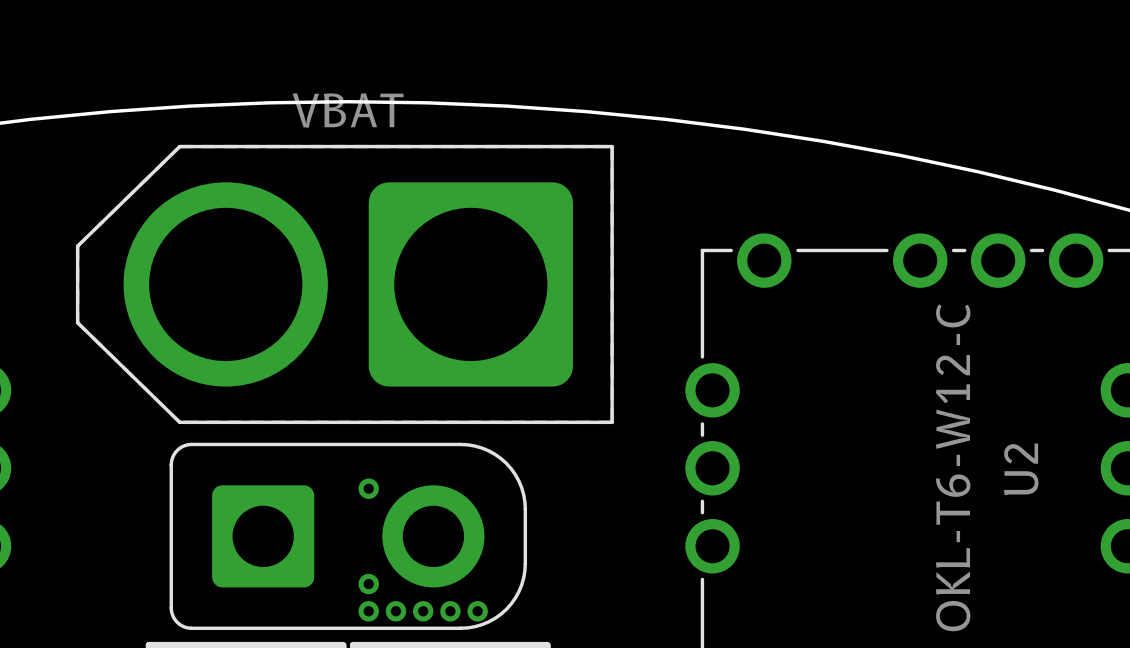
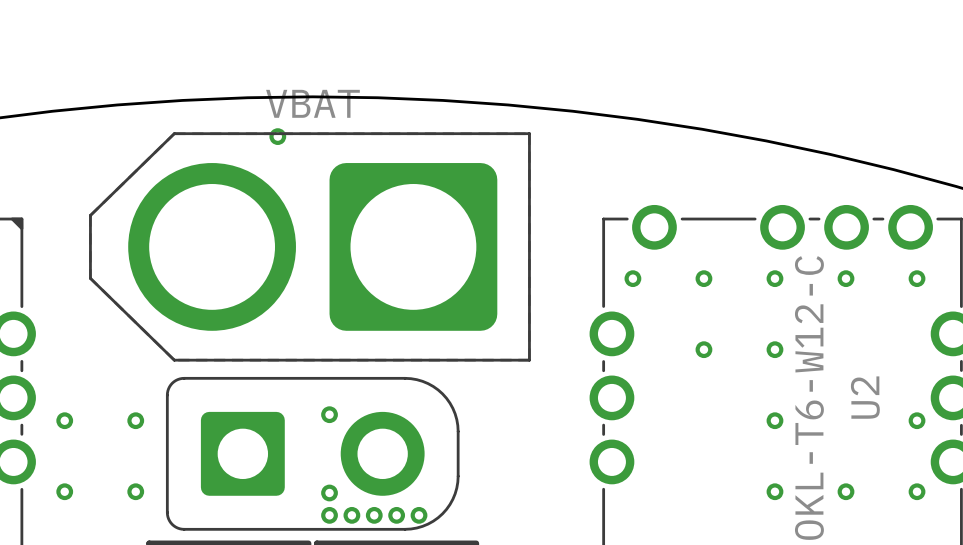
via: none -> (277, 136)
via: none -> (632, 278)
via: none -> (703, 278)
via: none -> (774, 278)
via: none -> (846, 278)
via: none -> (917, 278)
via: none -> (703, 349)
via: none -> (774, 349)
via: none -> (64, 420)
via: none -> (135, 420)
via: none -> (774, 420)
via: none -> (917, 420)
via: none -> (64, 491)
via: none -> (135, 491)
via: none -> (774, 491)
via: none -> (846, 491)
via: none -> (917, 491)

